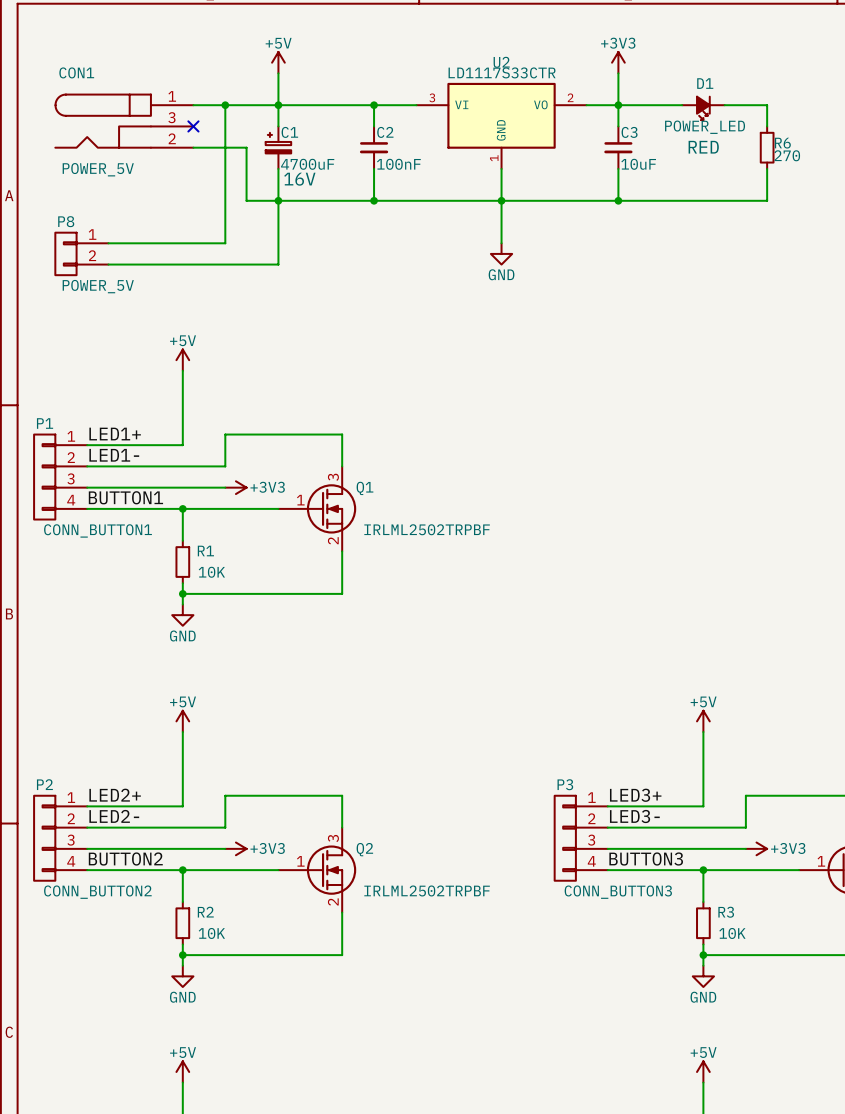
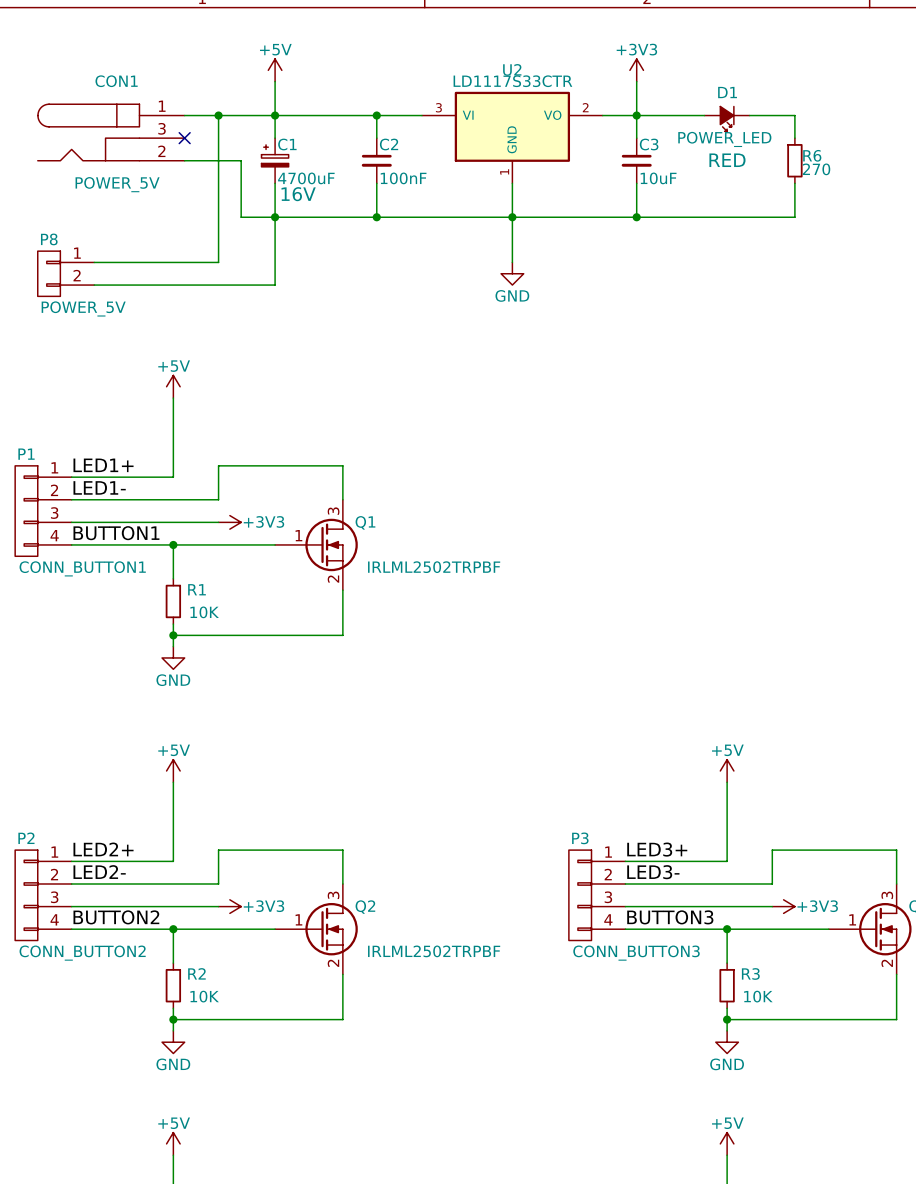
CON1 name position: CON1 (76, 72) -> CON1 (116, 81)
CON1 value position: POWER_5V (98, 169) -> POWER_5V (117, 184)

